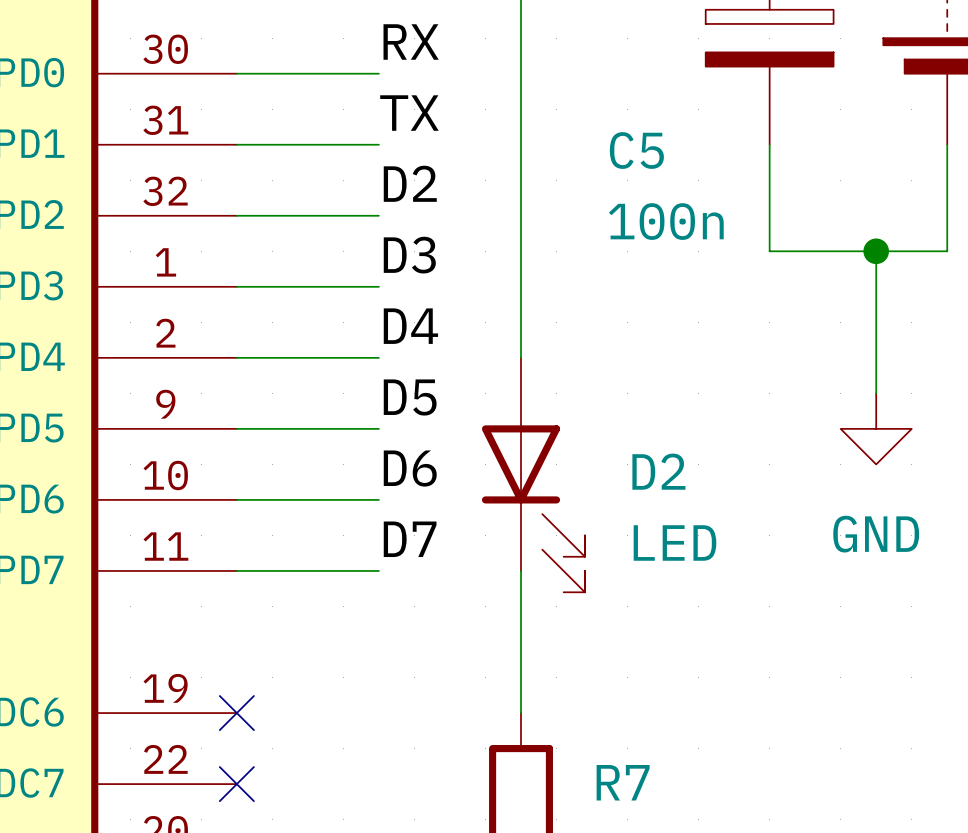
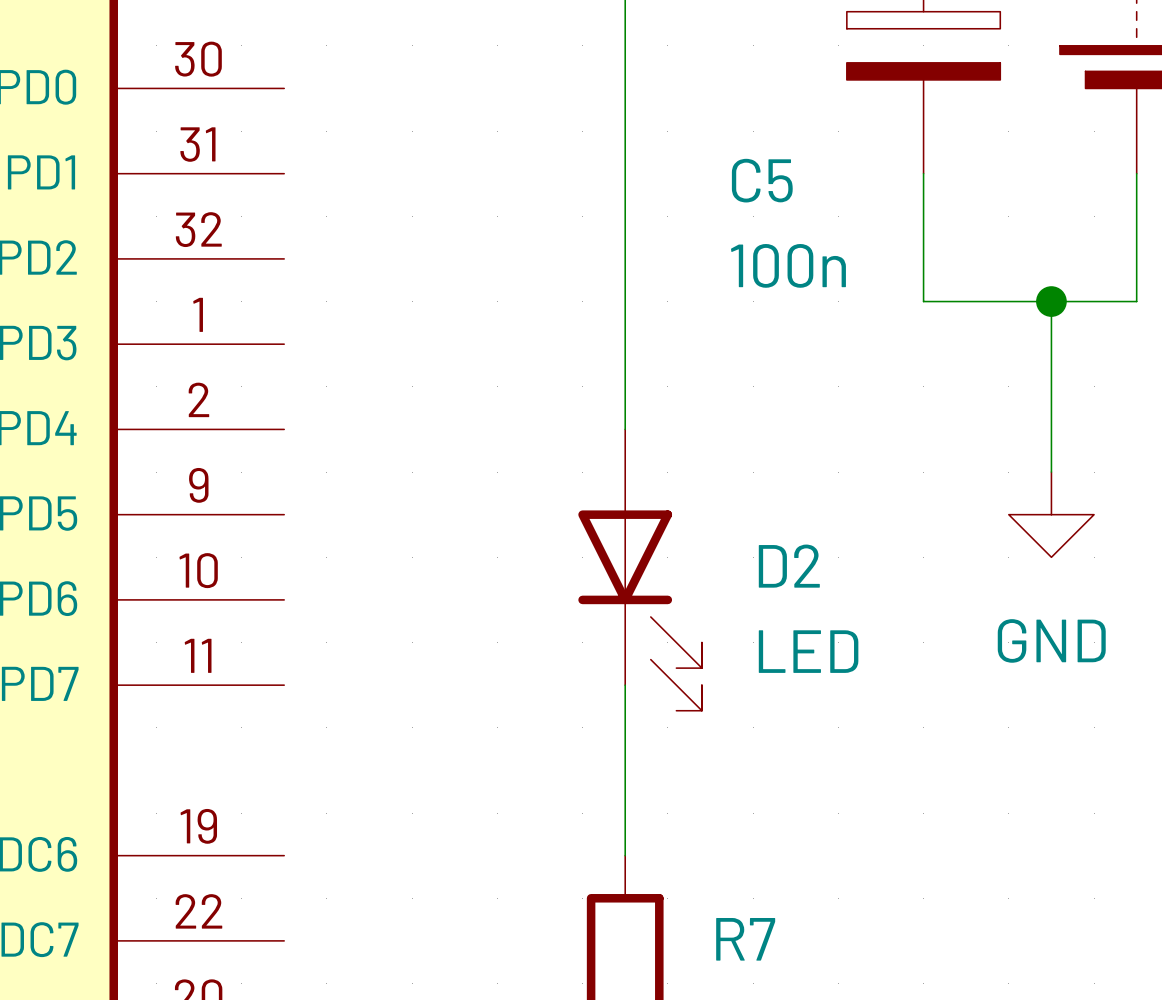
label: RX (411, 42) -> none
wire: (236, 73) (378, 73) -> none
label: TX (409, 113) -> none
wire: (236, 144) (378, 144) -> none
label: D2 (410, 183) -> none
wire: (236, 215) (378, 215) -> none
label: D3 (409, 255) -> none
wire: (236, 286) (378, 286) -> none
label: D4 (410, 326) -> none
wire: (236, 357) (378, 357) -> none
label: D5 (410, 397) -> none
wire: (236, 428) (378, 428) -> none
label: D6 (410, 468) -> none
wire: (236, 499) (378, 499) -> none
label: D7 (410, 539) -> none
wire: (236, 570) (378, 570) -> none
no-connect mark: (236, 713) -> none
no-connect mark: (236, 784) -> none

